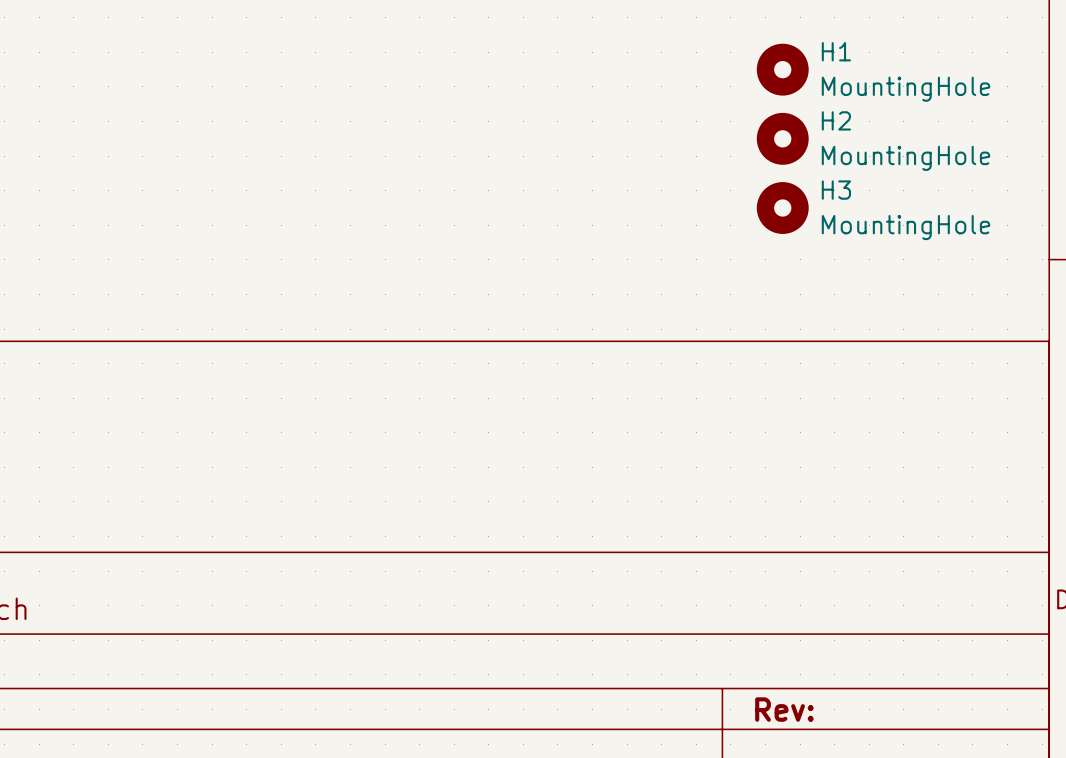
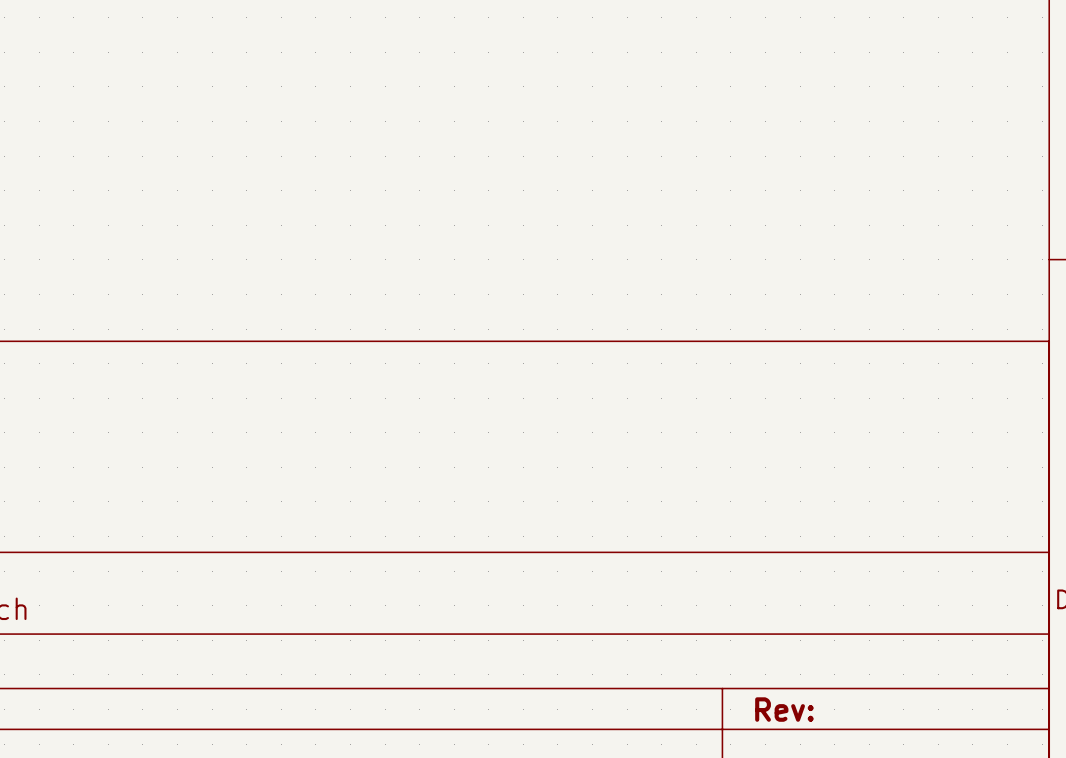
H1: MountingHole (782, 69) -> none
H2: MountingHole (782, 138) -> none
H3: MountingHole (782, 208) -> none

